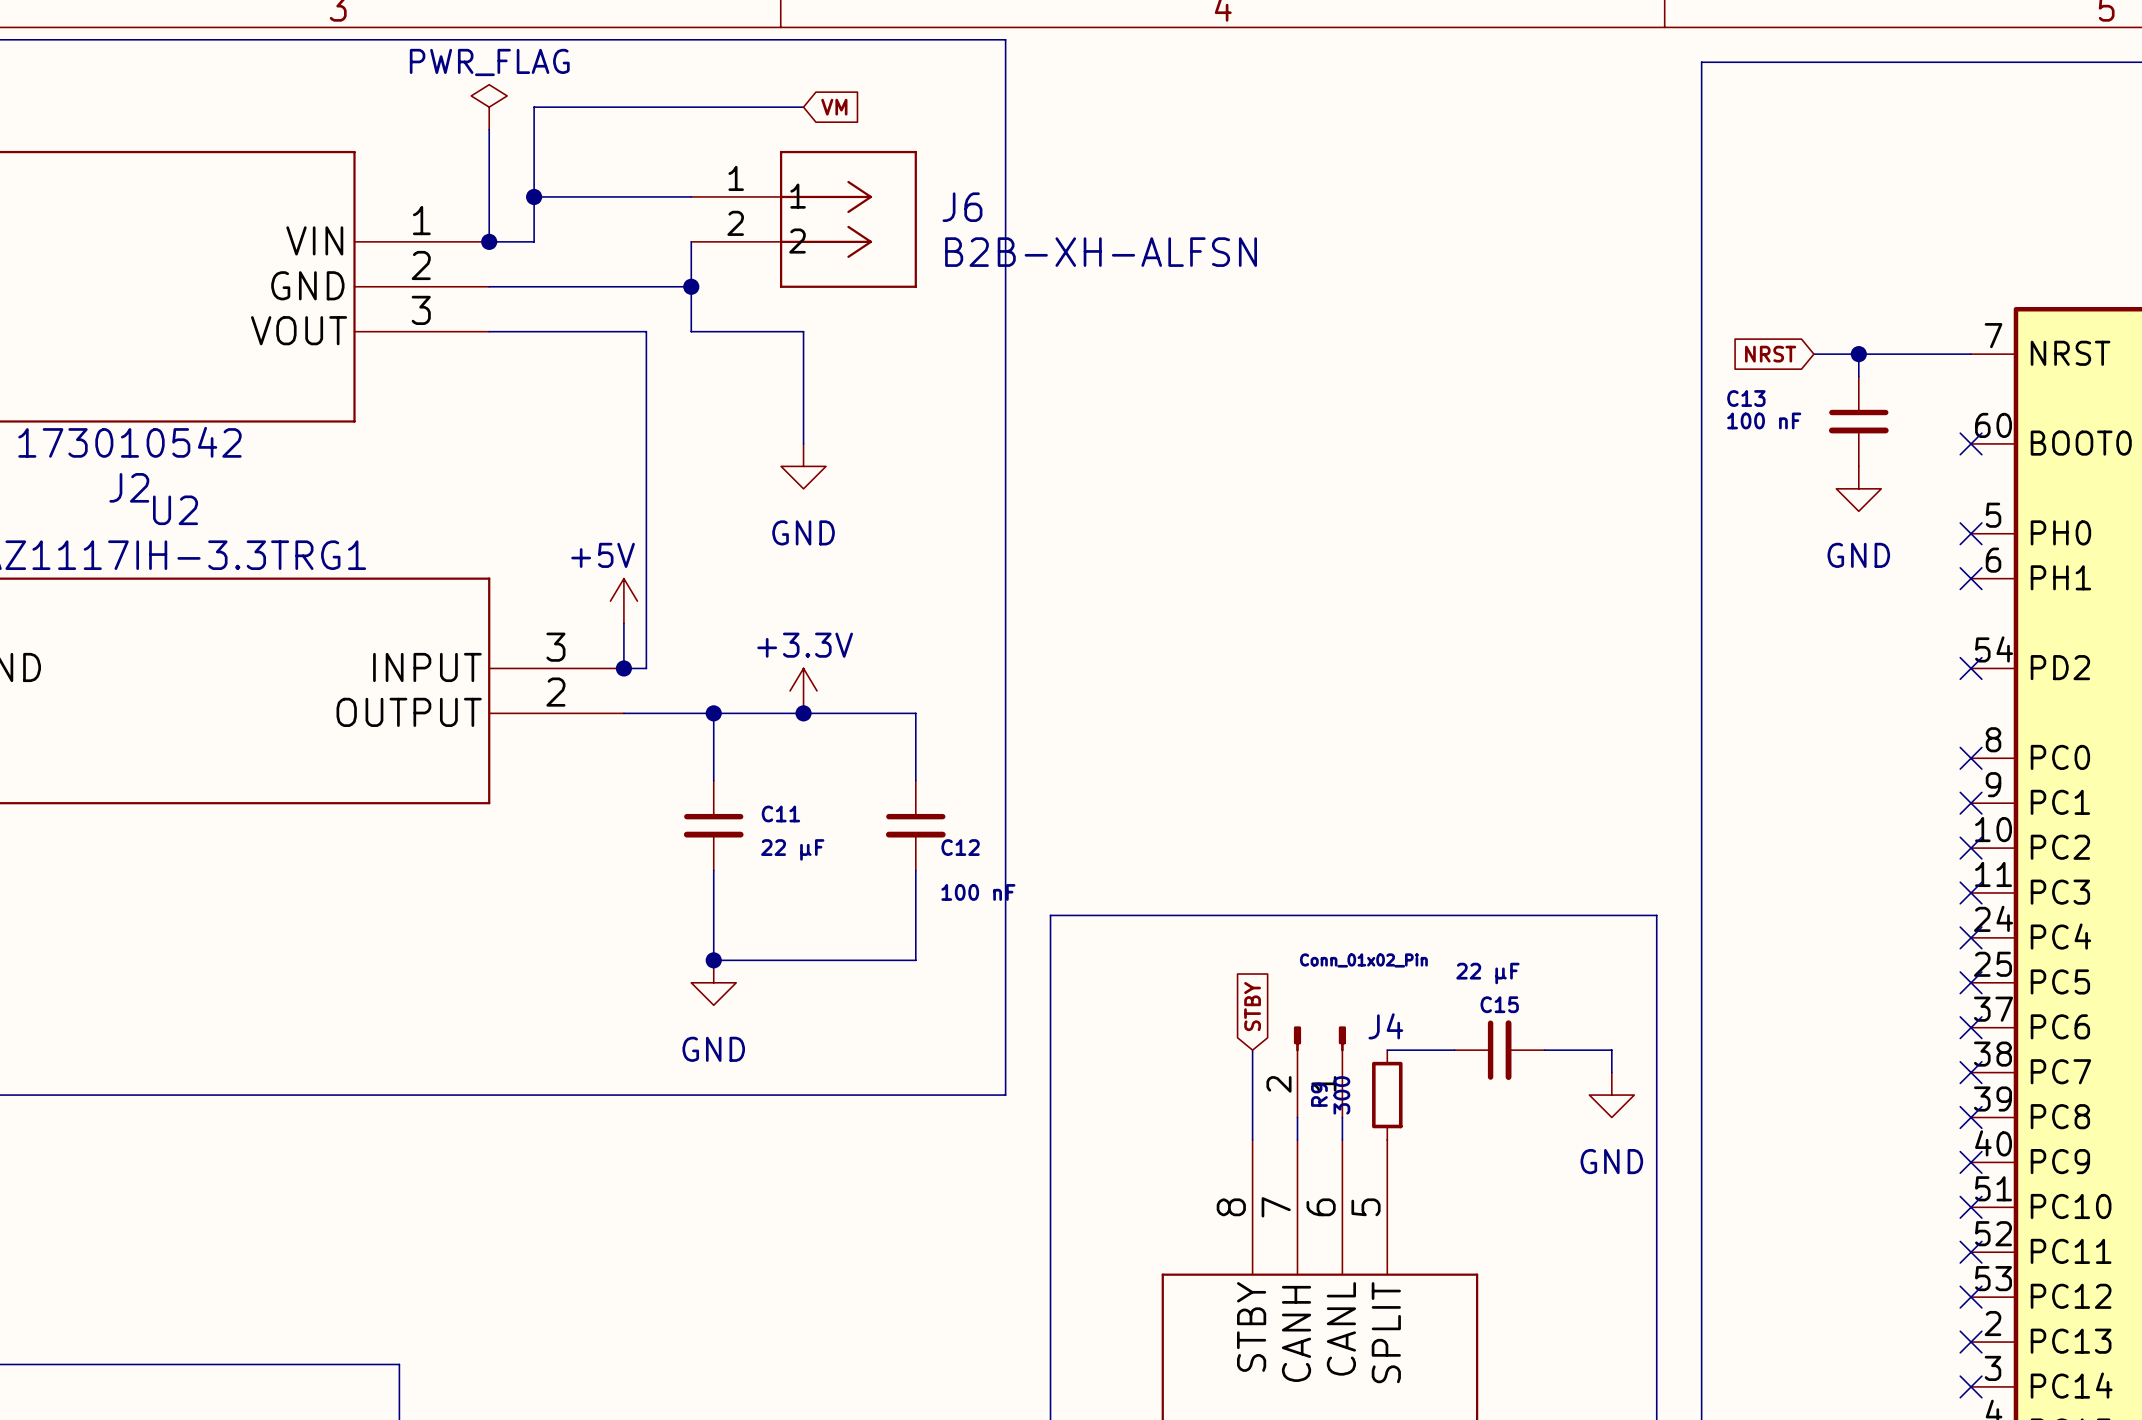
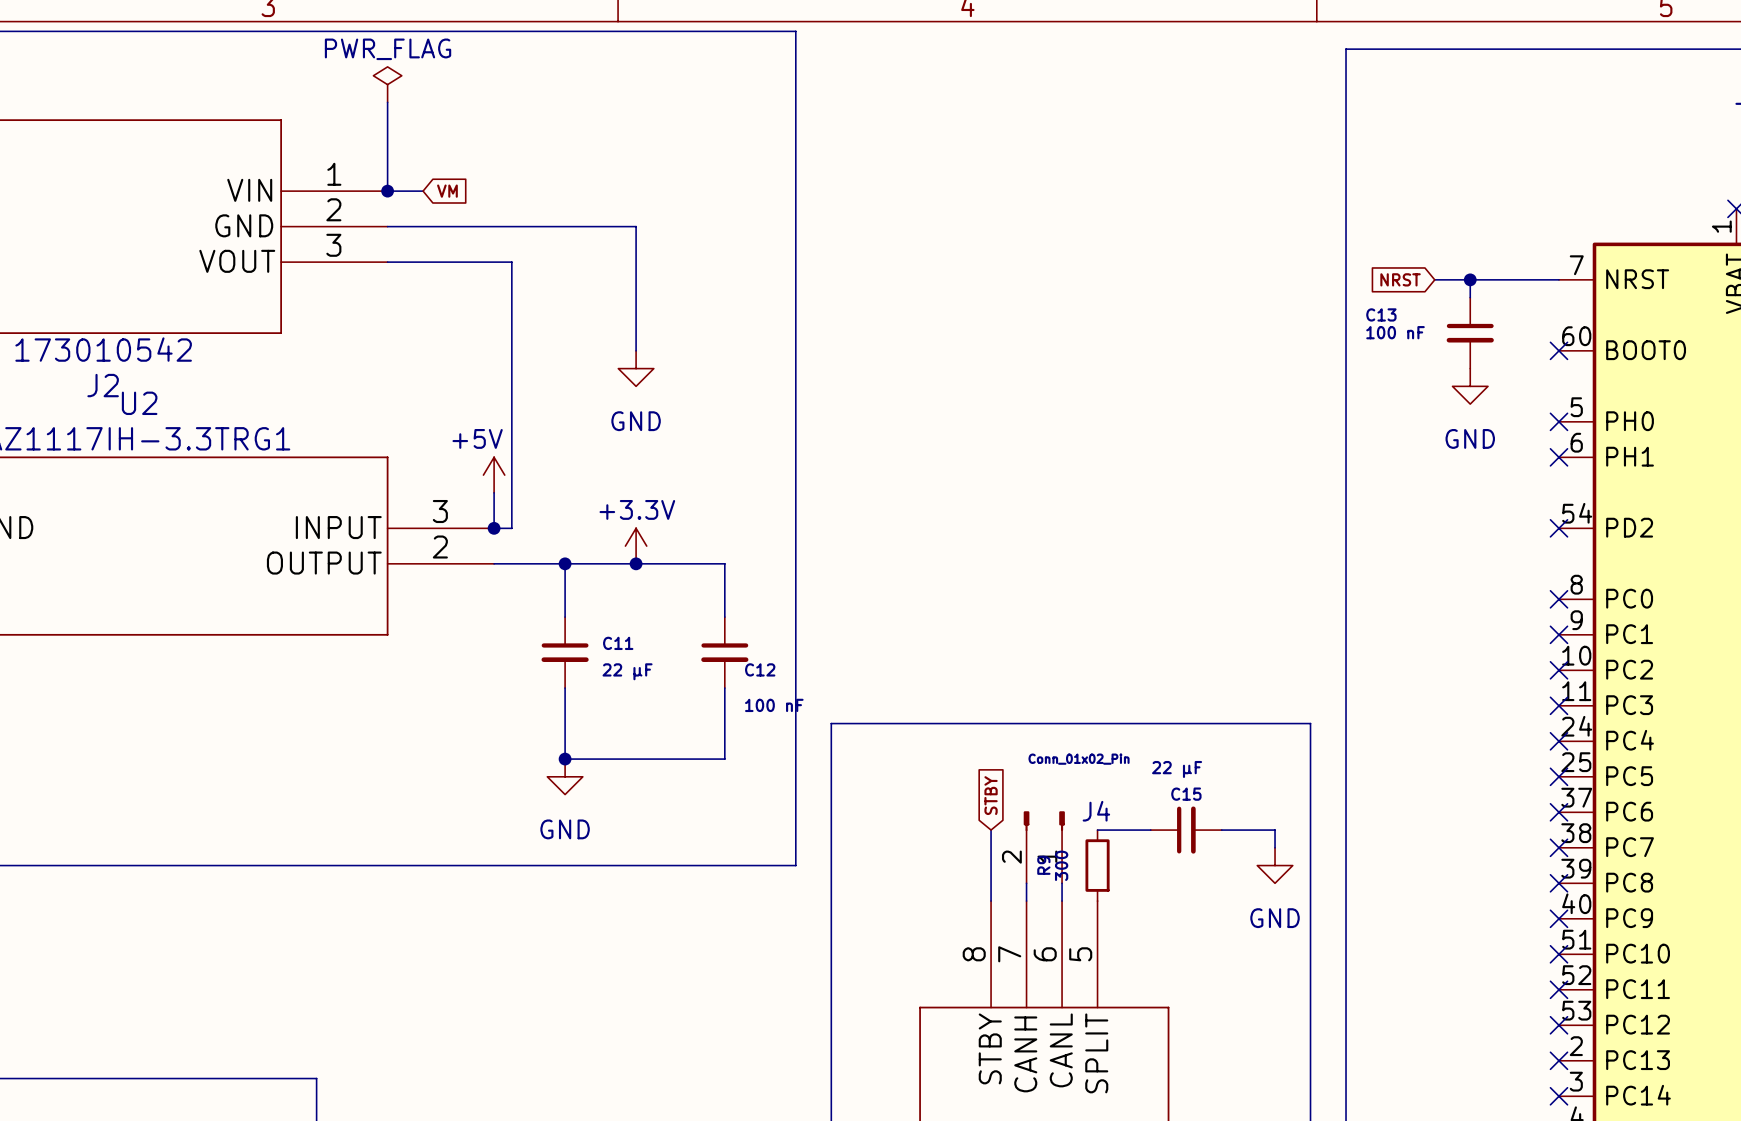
wire: (803, 107) (534, 107) (534, 241) -> none
global label position: VM (834, 107) -> VM (447, 191)
wire: (534, 196) (691, 196) -> none
junction: (534, 196) -> none
J6: B2B-XH-ALFSN (804, 219) -> none
wire: (691, 241) (691, 331) (803, 331) -> (547, 226) (636, 226) (636, 262)
junction: (691, 286) -> none

